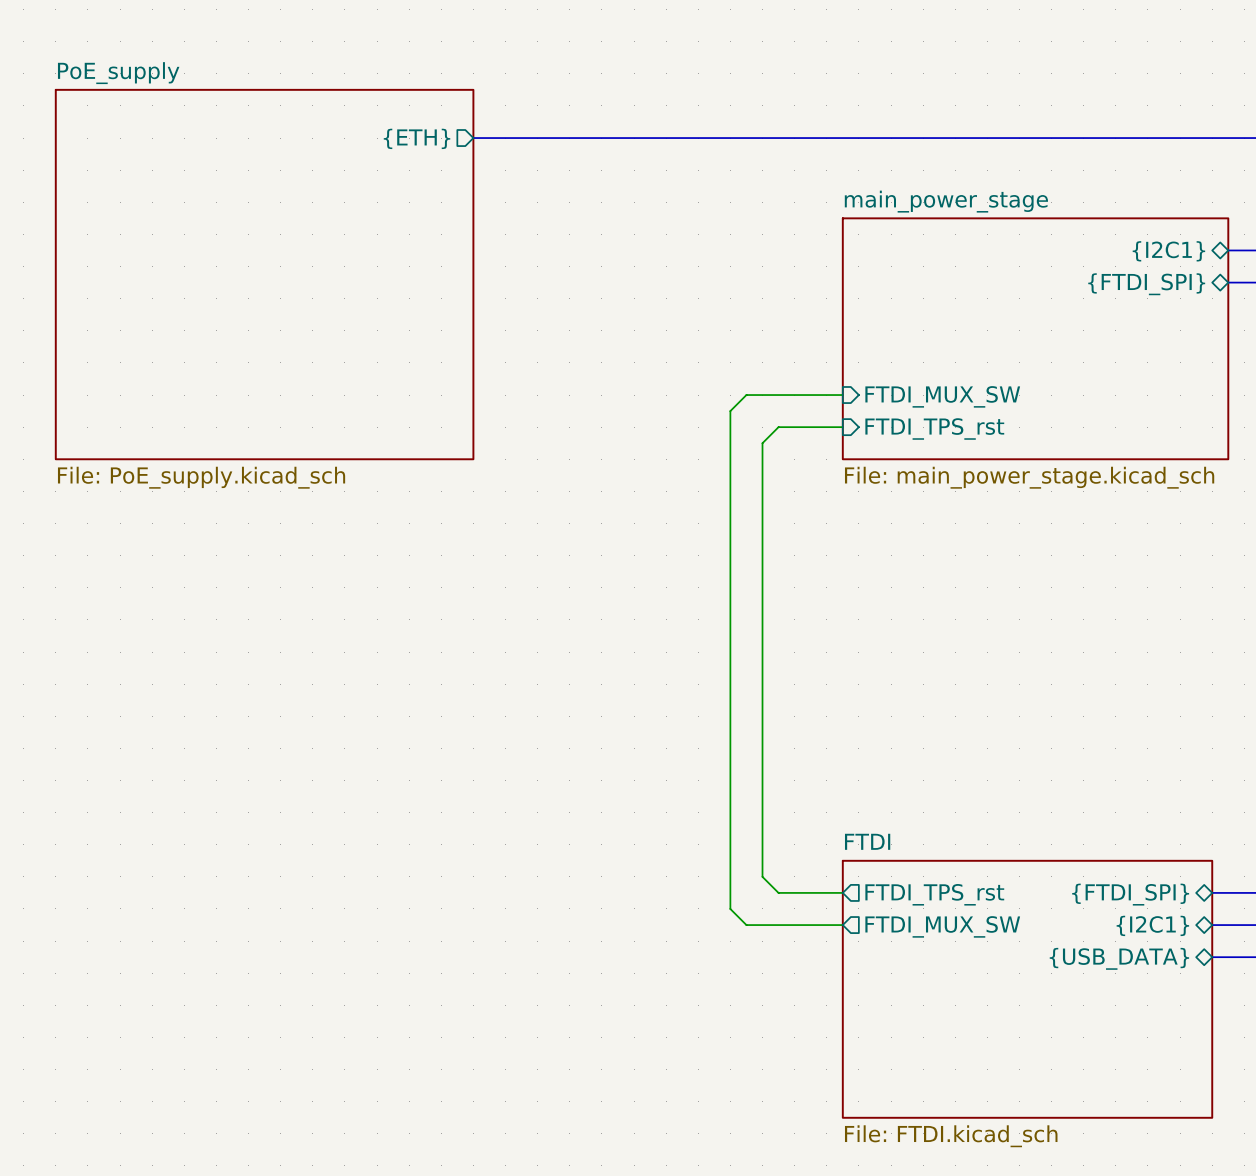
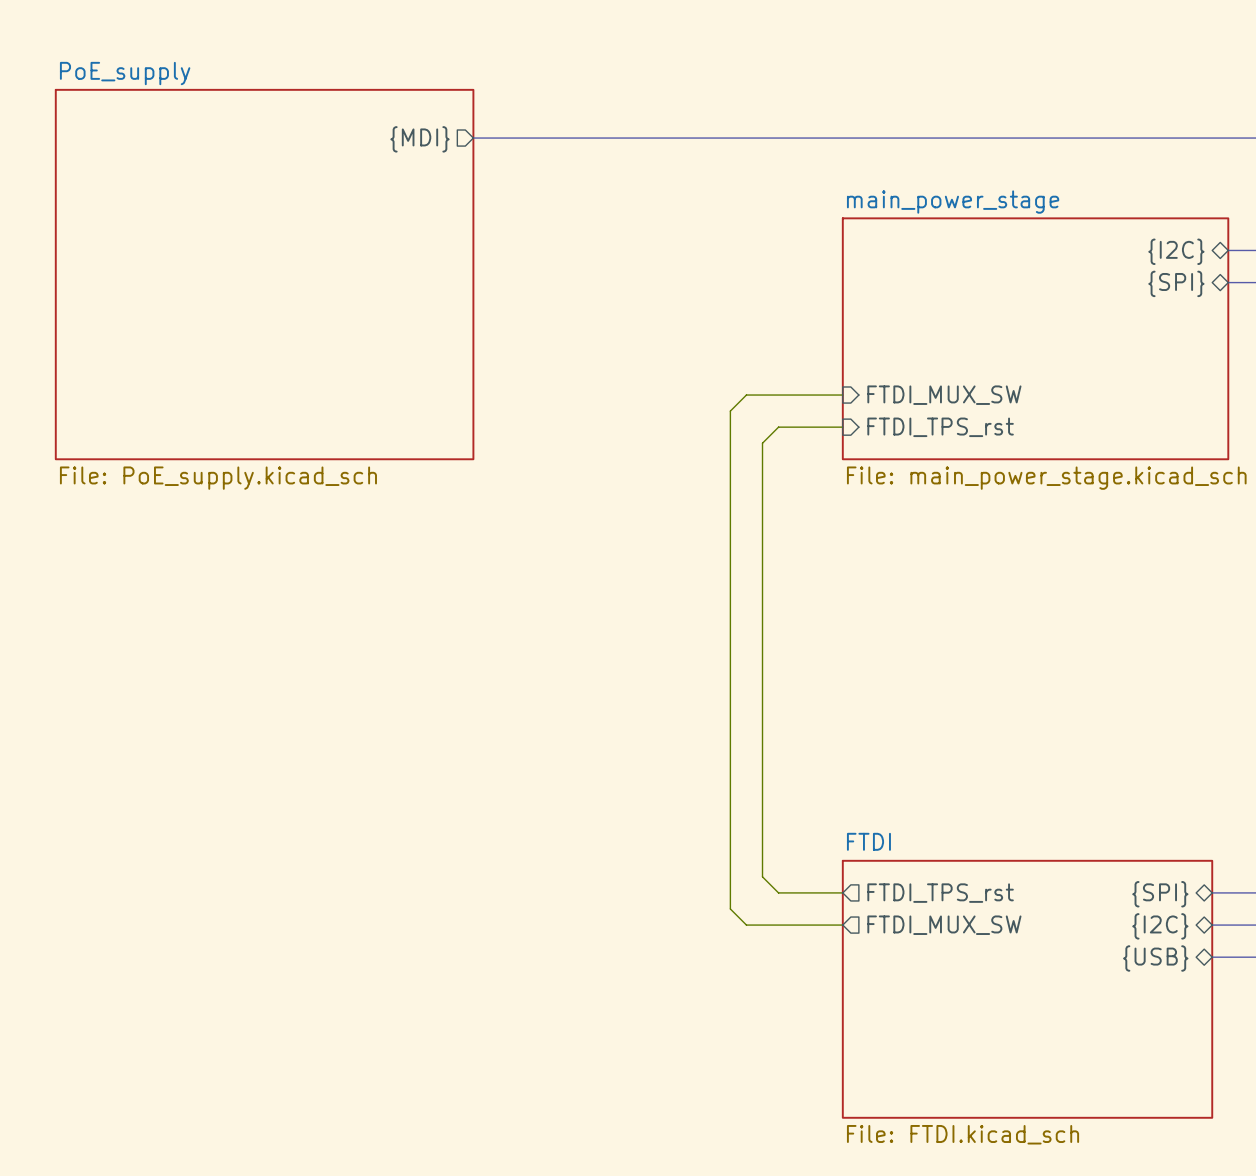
sheet pin: {ETH} (417, 138) -> {MDI} (419, 139)
sheet pin: {I2C1} (1168, 251) -> {I2C} (1176, 251)
sheet pin: {FTDI_SPI} (1146, 284) -> {SPI} (1176, 283)
sheet pin: {FTDI_SPI} (1130, 894) -> {SPI} (1160, 894)
sheet pin: {I2C1} (1152, 925) -> {I2C} (1160, 926)
sheet pin: {USB_DATA} (1119, 958) -> {USB} (1155, 958)

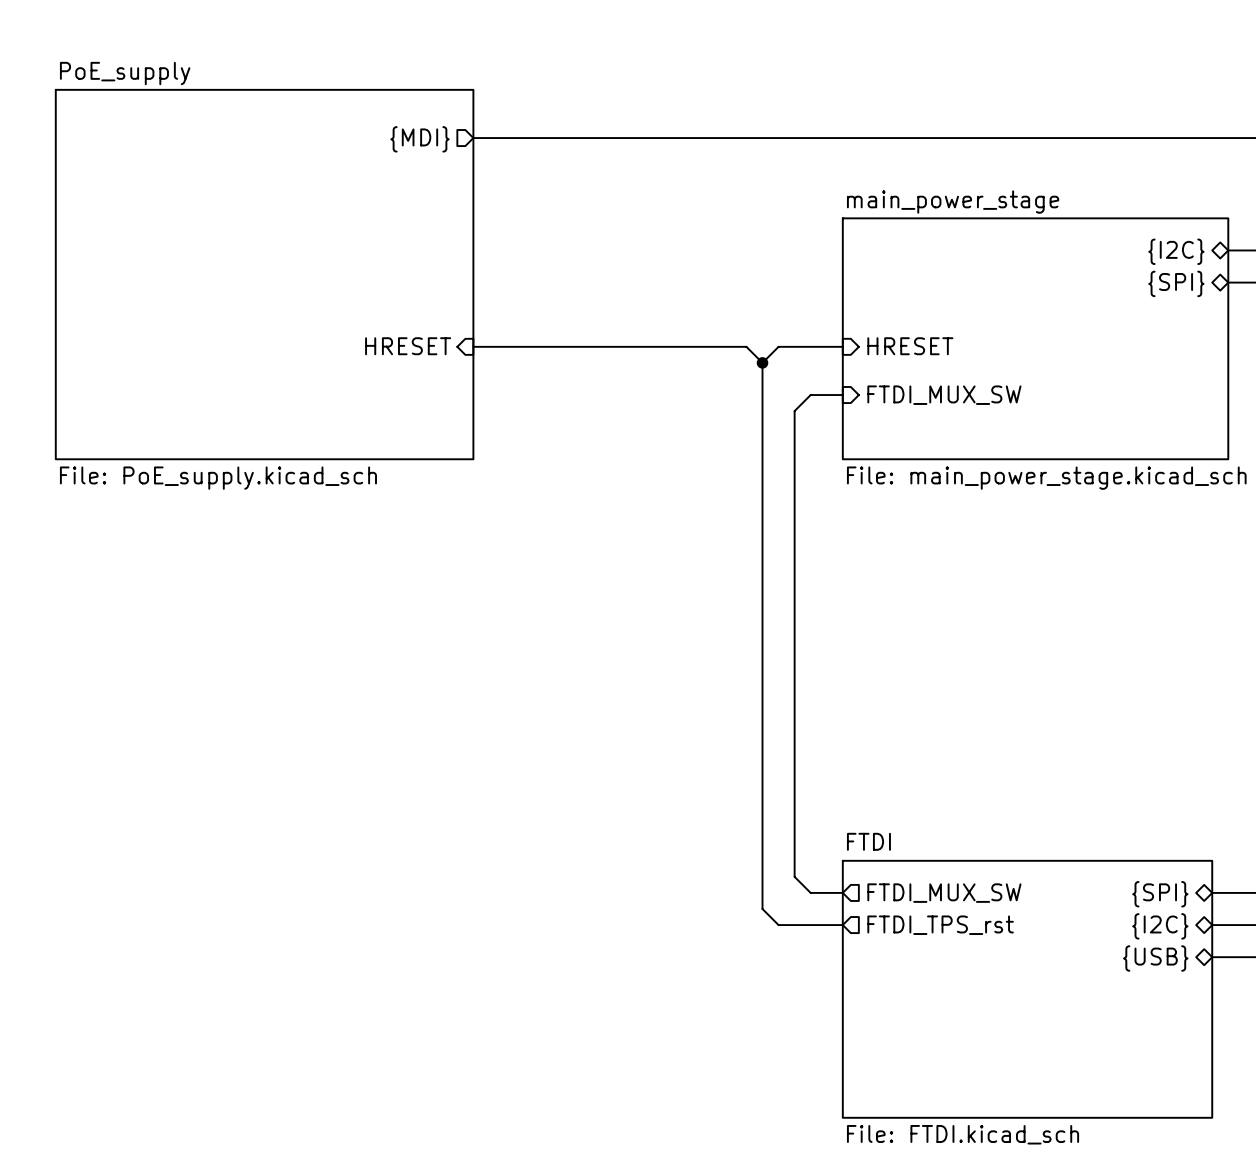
sheet pin: none -> HRESET (408, 346)
wire: none -> (473, 346) (746, 346) (762, 362)
wire: none -> (842, 346) (778, 346) (762, 362)
sheet pin: none -> HRESET (910, 346)
junction: none -> (762, 362)
wire: (810, 395) (746, 395) (730, 411) (730, 908) (746, 925) (778, 925) -> (810, 395) (794, 411) (794, 876) (810, 892)
wire: (842, 427) (778, 427) (762, 443) -> (762, 362) (762, 443)
sheet pin: FTDI_TPS_rst (940, 427) -> none
wire: (762, 876) (778, 892) (810, 892) -> (762, 876) (762, 908) (778, 925)
sheet pin: FTDI_TPS_rst (940, 893) -> FTDI_MUX_SW (944, 893)
sheet pin: FTDI_MUX_SW (944, 925) -> FTDI_TPS_rst (940, 925)

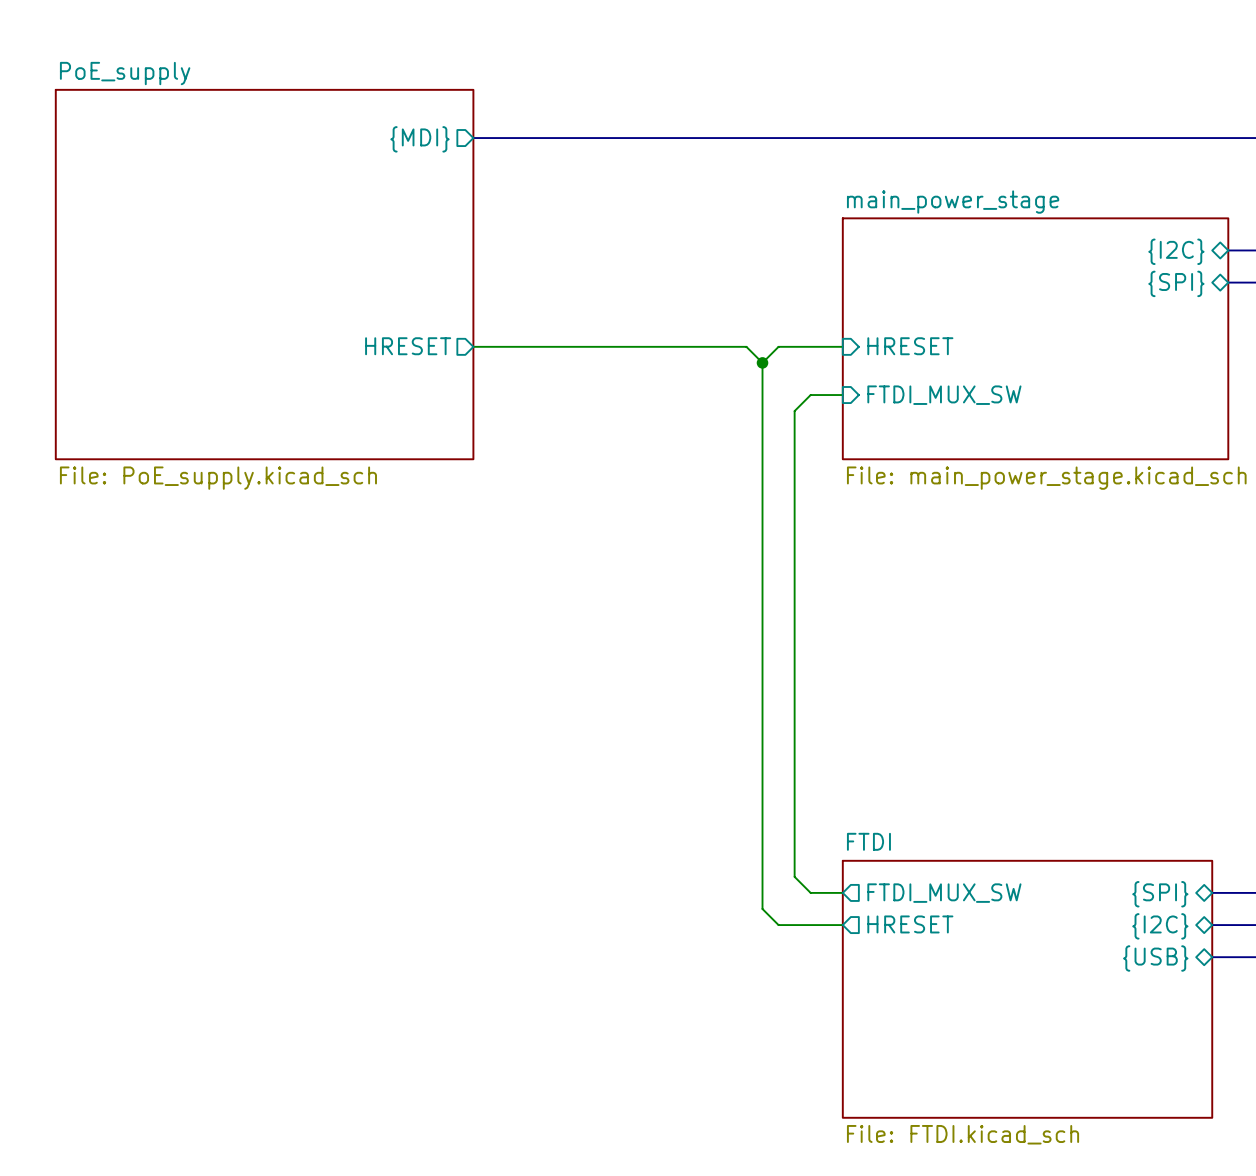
sheet pin shape: input (408, 346) -> output (408, 346)
sheet pin: FTDI_TPS_rst (940, 925) -> HRESET (910, 924)

